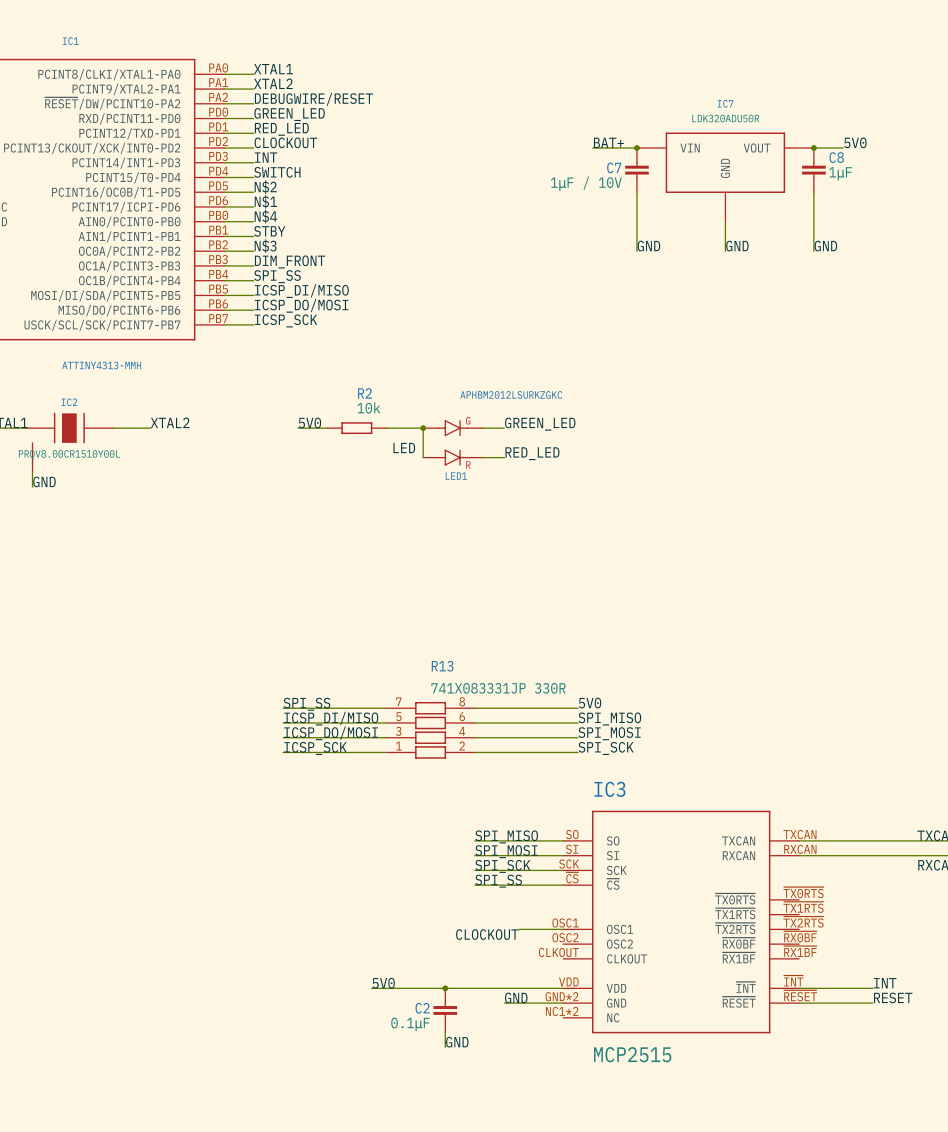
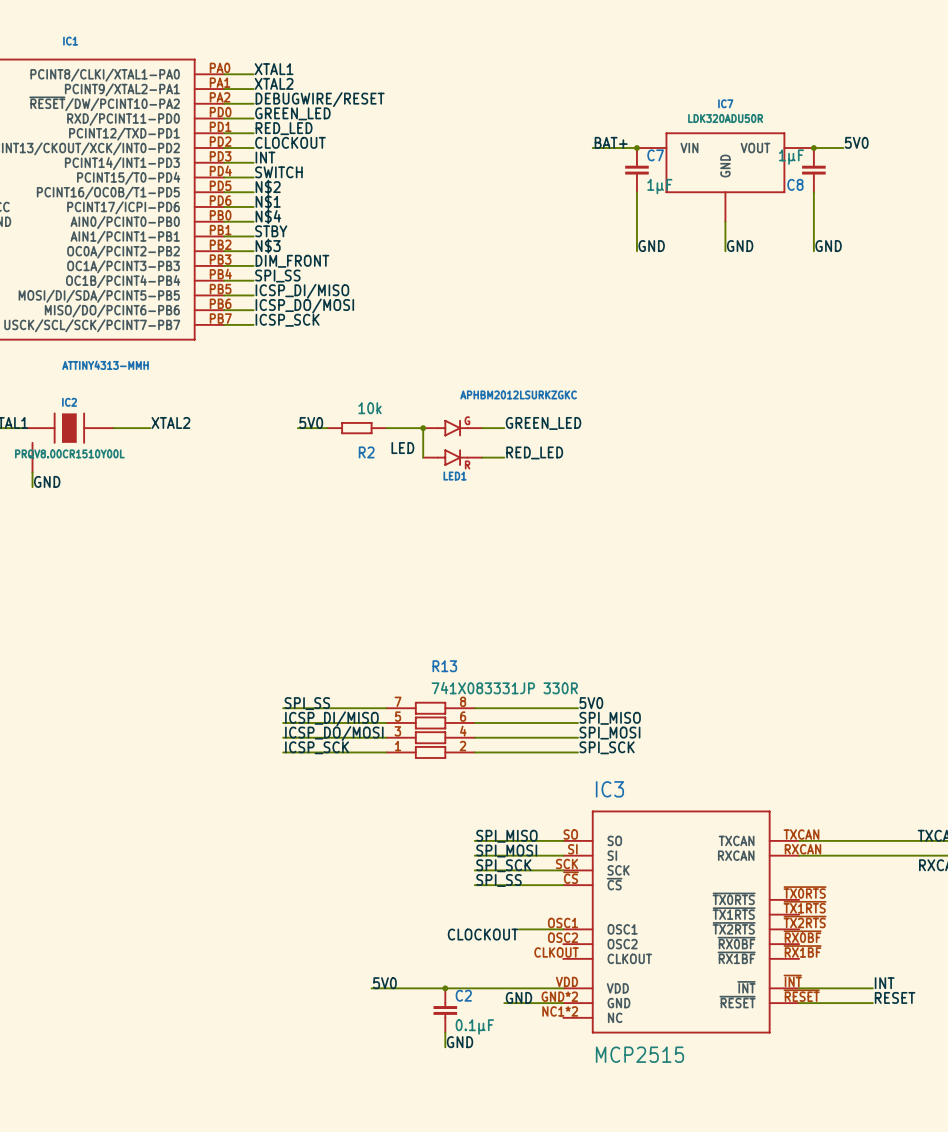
C8 name position: C8 (836, 157) -> C8 (795, 184)
C7 name position: C7 (614, 167) -> C7 (655, 155)
C8 value position: 1μF (840, 173) -> 1μF (791, 157)
C7 value: 1μF / 10V (586, 183) -> 1μF (659, 186)
R2 name position: R2 (365, 393) -> R2 (366, 452)
C2 name position: C2 (422, 1008) -> C2 (463, 995)
C2 value position: 0.1μF (410, 1024) -> 0.1μF (474, 1026)

